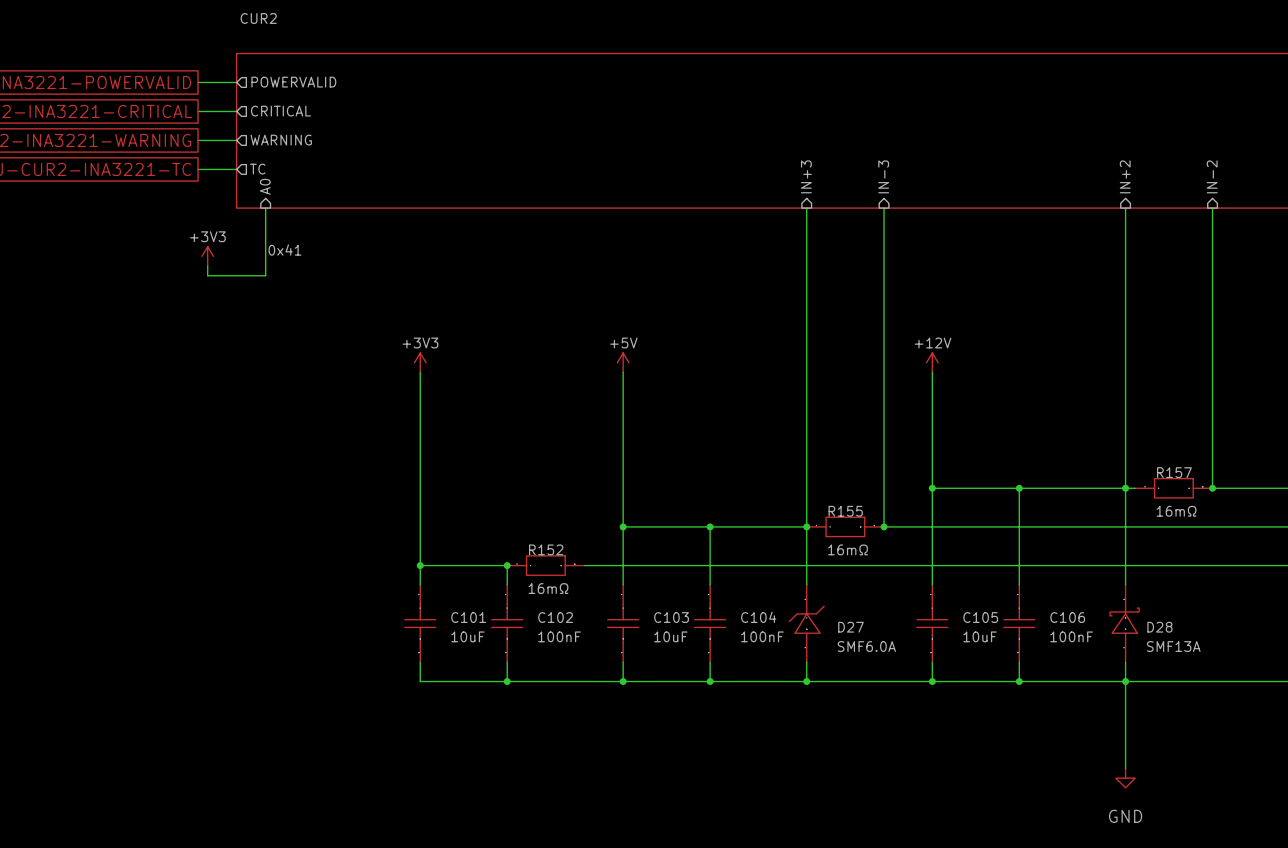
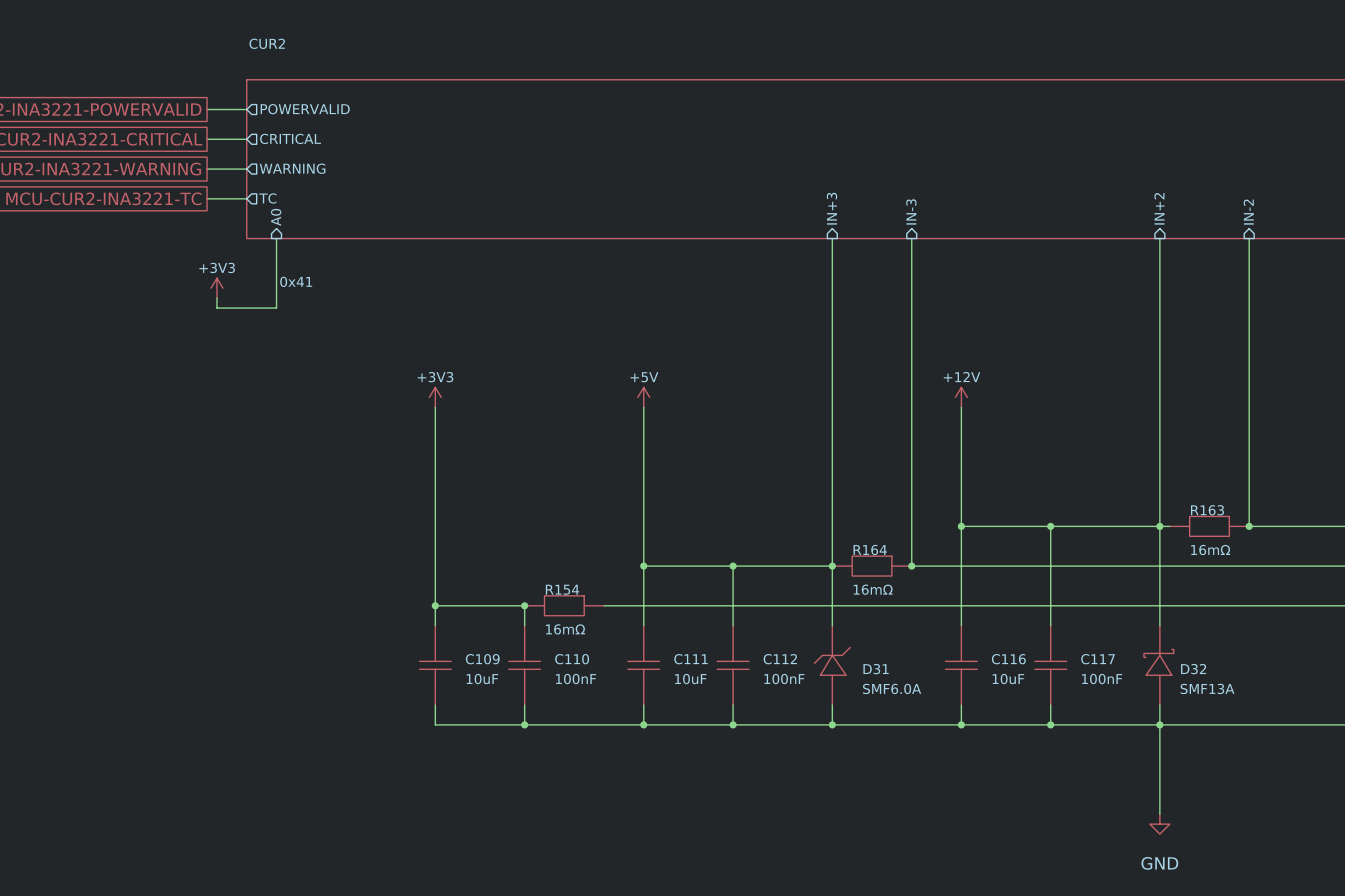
R157 name: R157 (1174, 472) -> R163 (1207, 510)
R155 name: R155 (845, 511) -> R164 (870, 549)
R152 name: R152 (546, 549) -> R154 (562, 589)
C101 name: C101 (468, 617) -> C109 (482, 659)
C102 name: C102 (555, 617) -> C110 (572, 659)
C103 name: C103 (671, 617) -> C111 (691, 659)
C104 name: C104 (758, 617) -> C112 (780, 659)
C105 name: C105 (980, 617) -> C116 (1008, 659)
C106 name: C106 (1067, 617) -> C117 (1098, 659)
D27 name: D27 (850, 627) -> D31 (876, 669)
D28 name: D28 (1159, 627) -> D32 (1193, 669)

